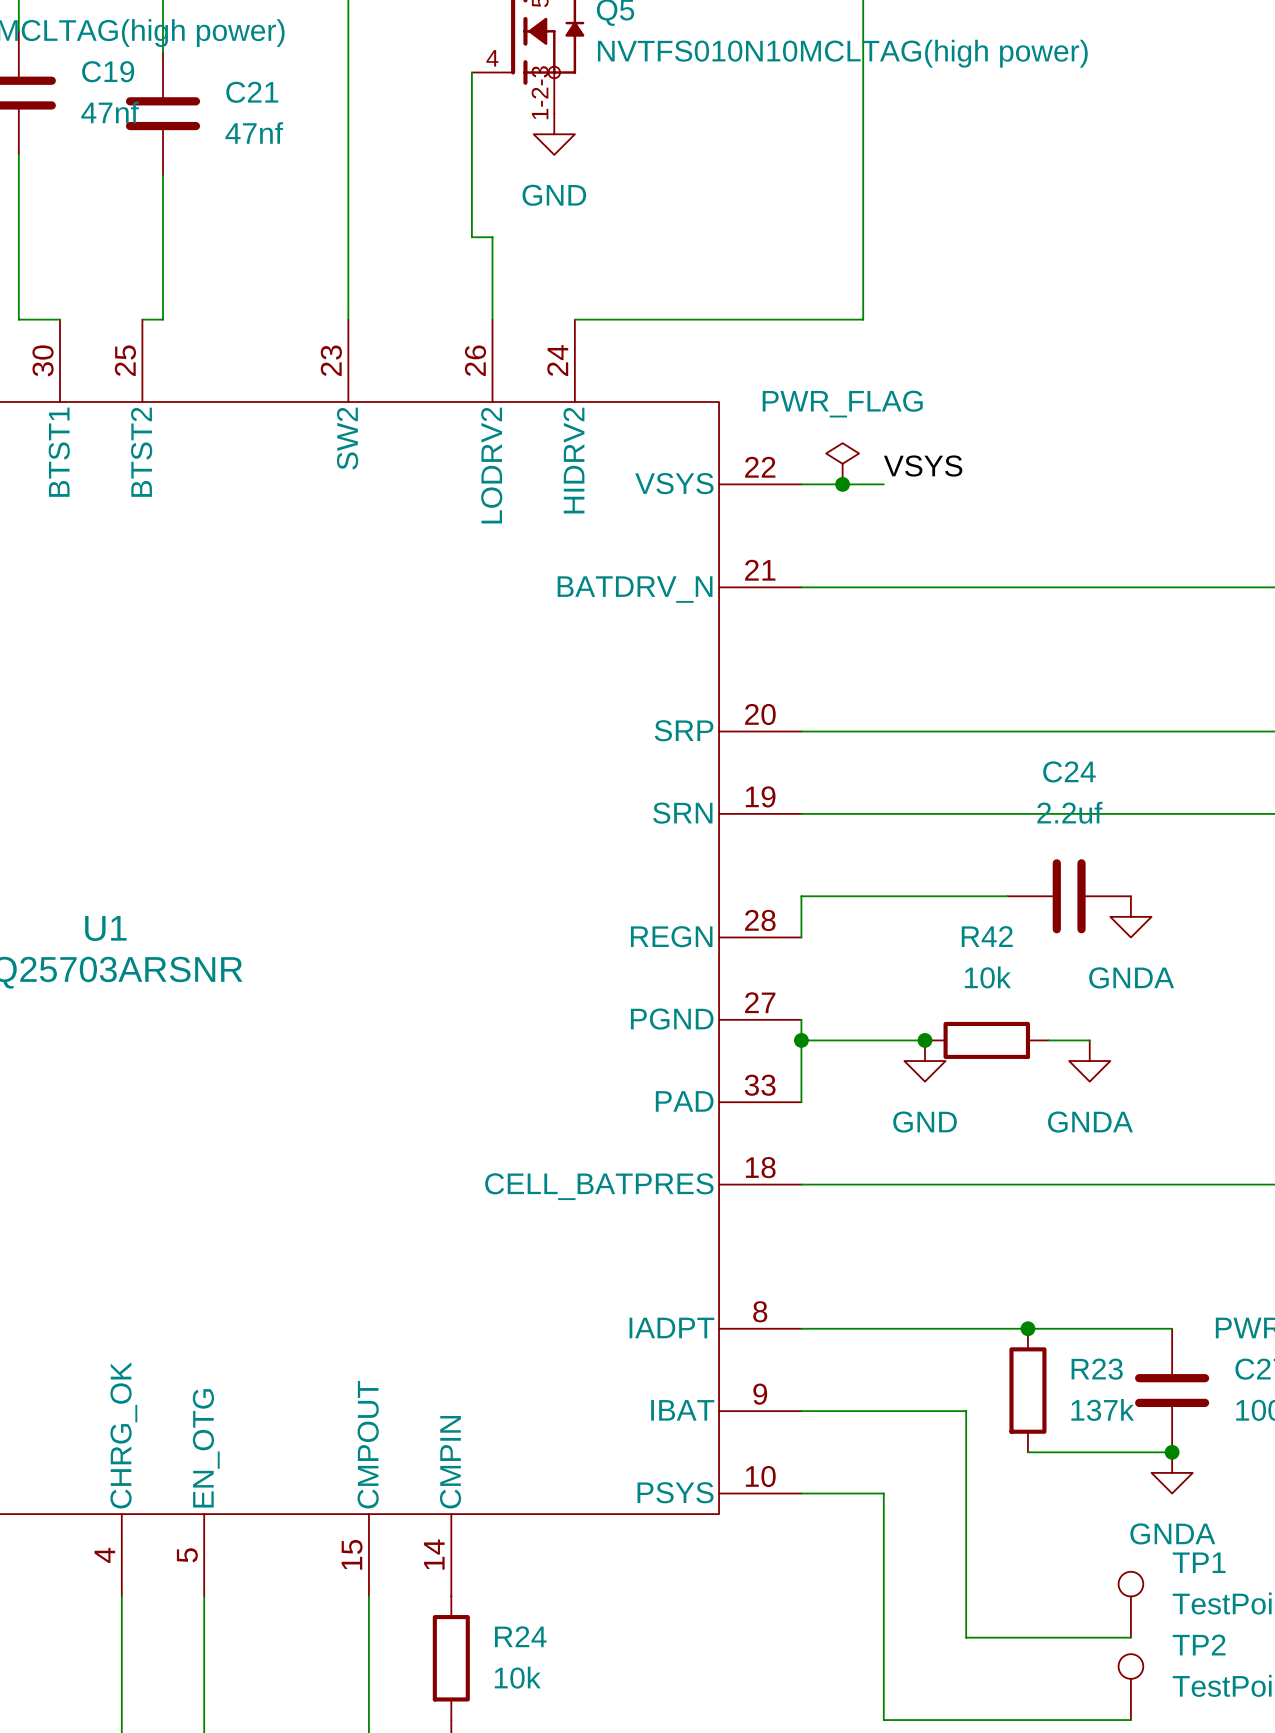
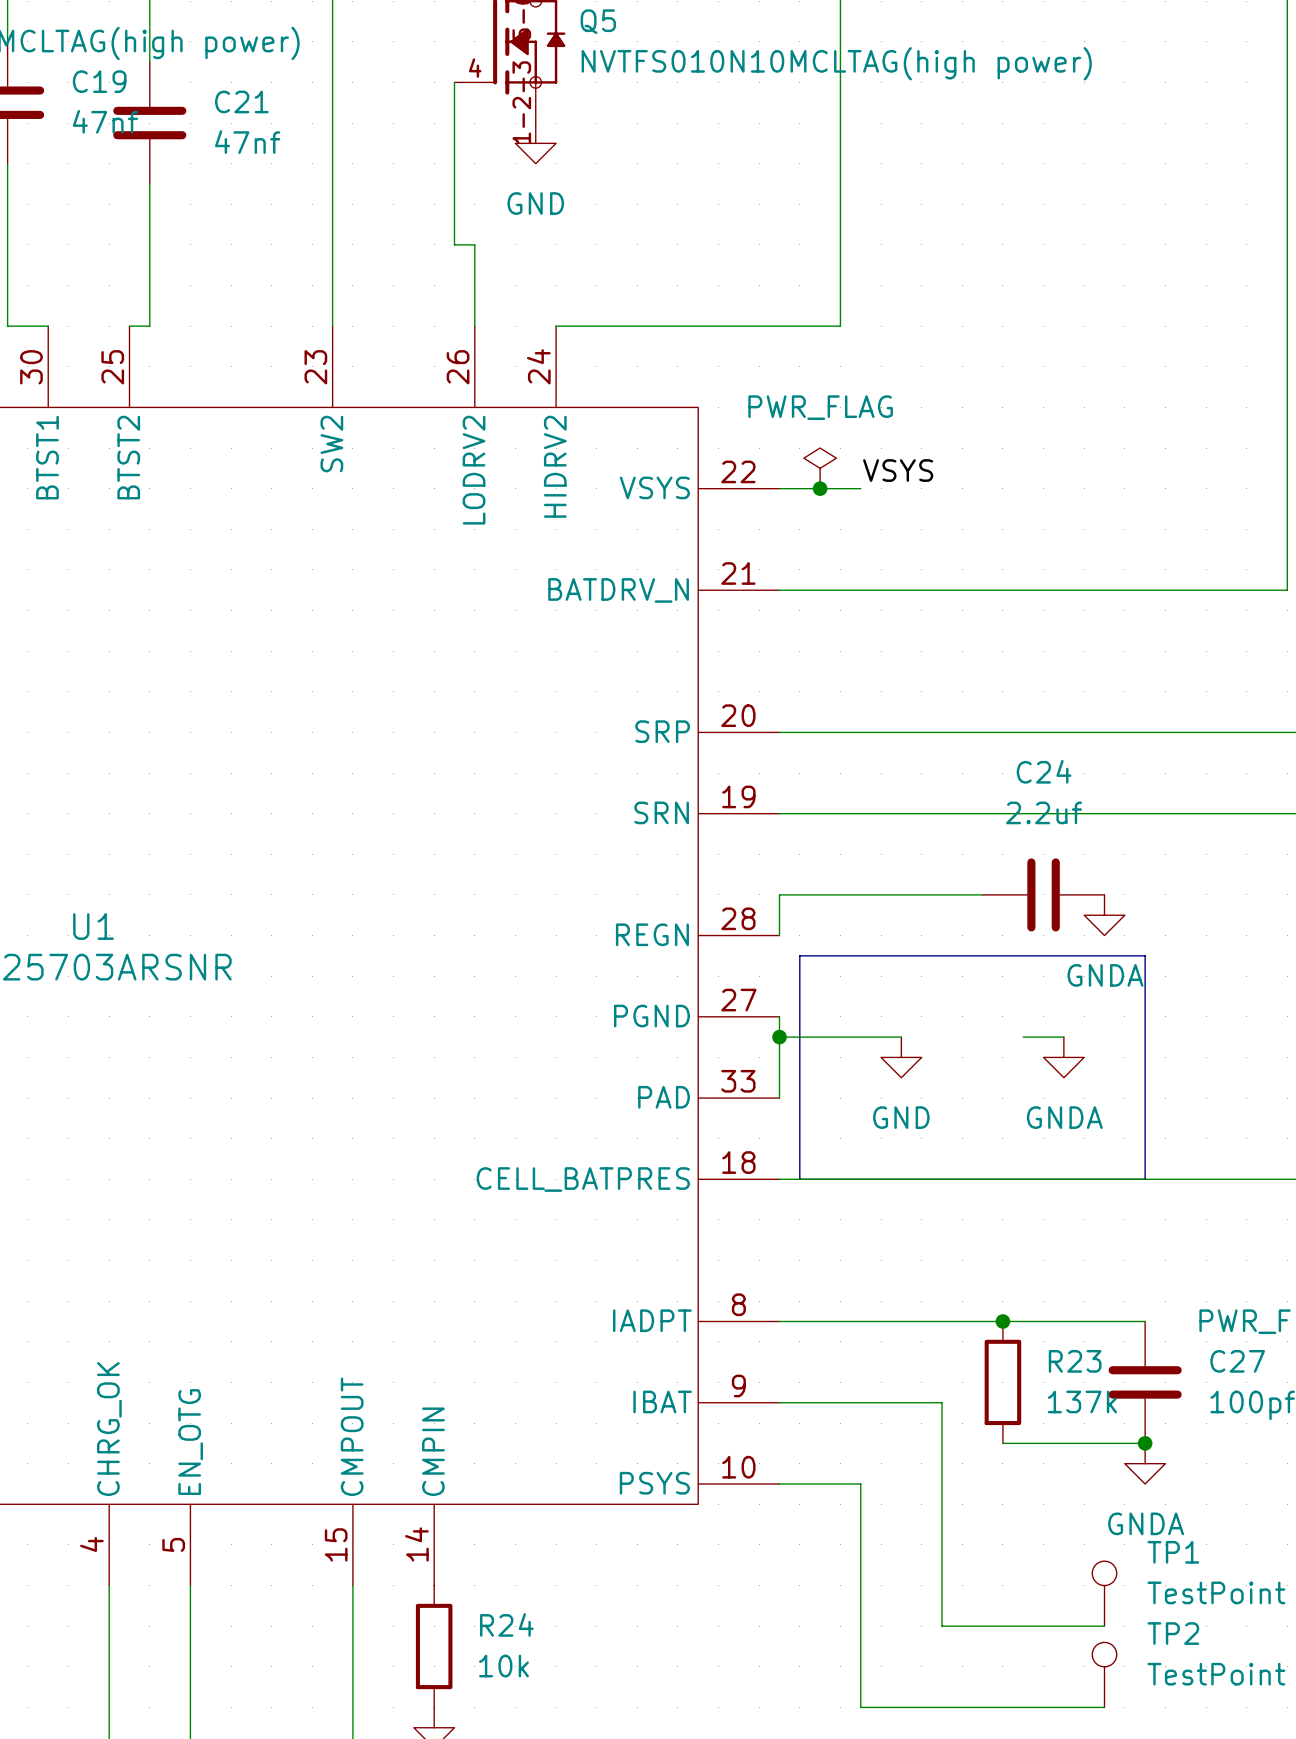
line: none -> (799, 955) (1145, 955) (1145, 1179) (799, 1179) (799, 955)
junction: (924, 1040) -> none
R42: 10k (986, 1040) -> none

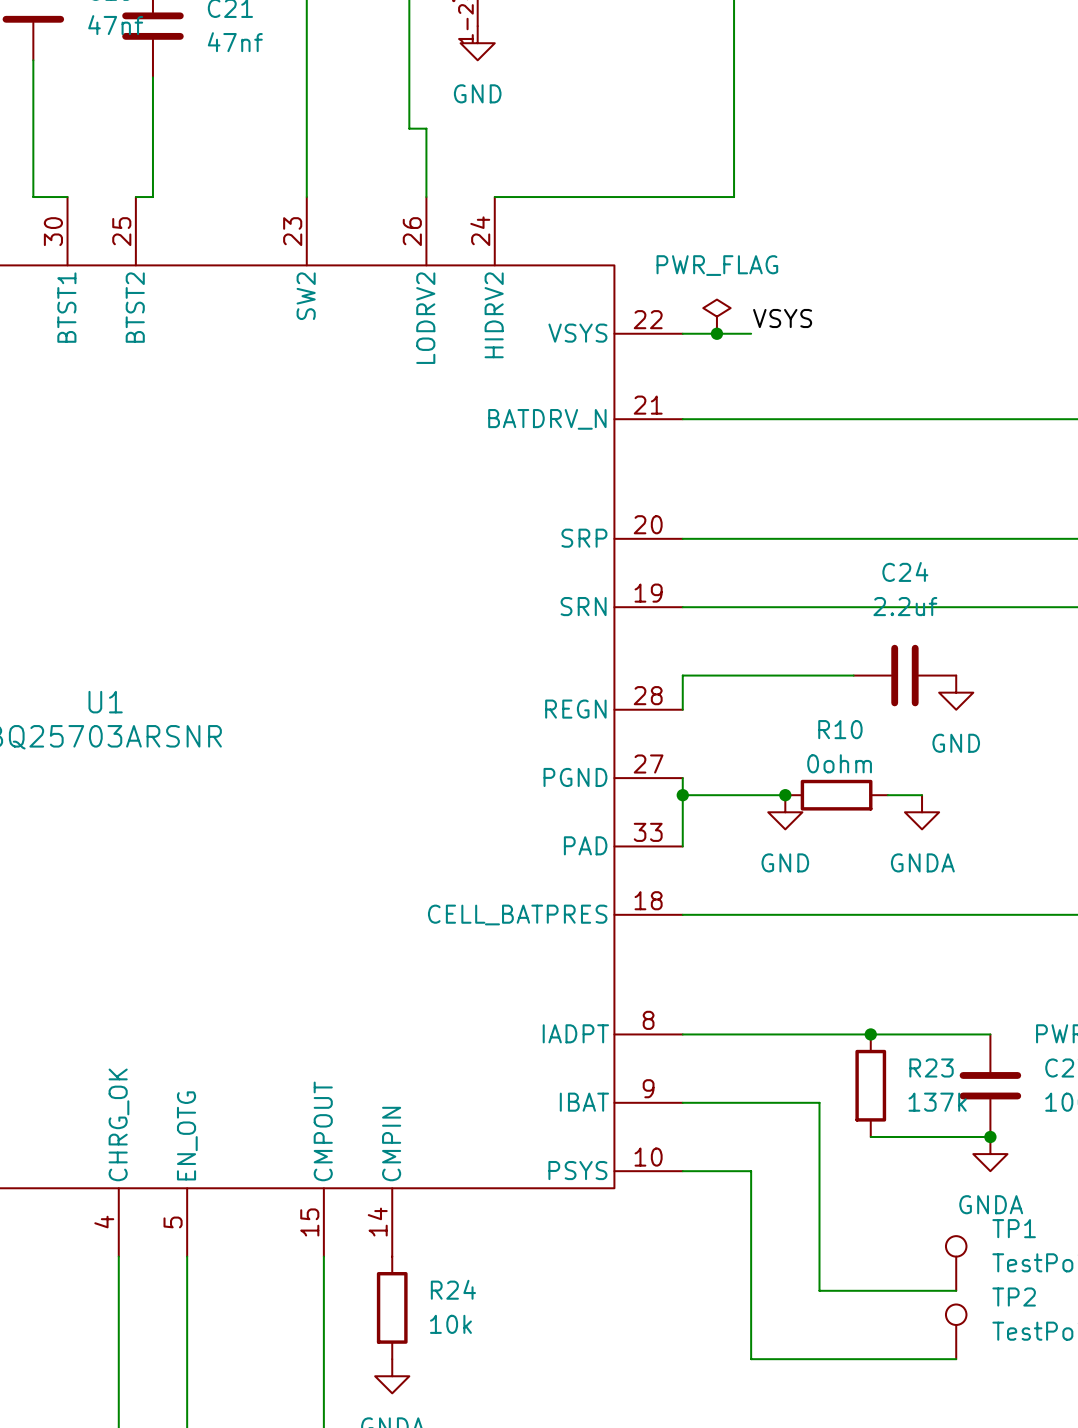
power symbol: GNDA (1104, 915) -> GND (956, 692)
line: (799, 955) (1145, 955) (1145, 1179) (799, 1179) (799, 955) -> none
junction: none -> (785, 795)
R10: none -> 0ohm (836, 795)

